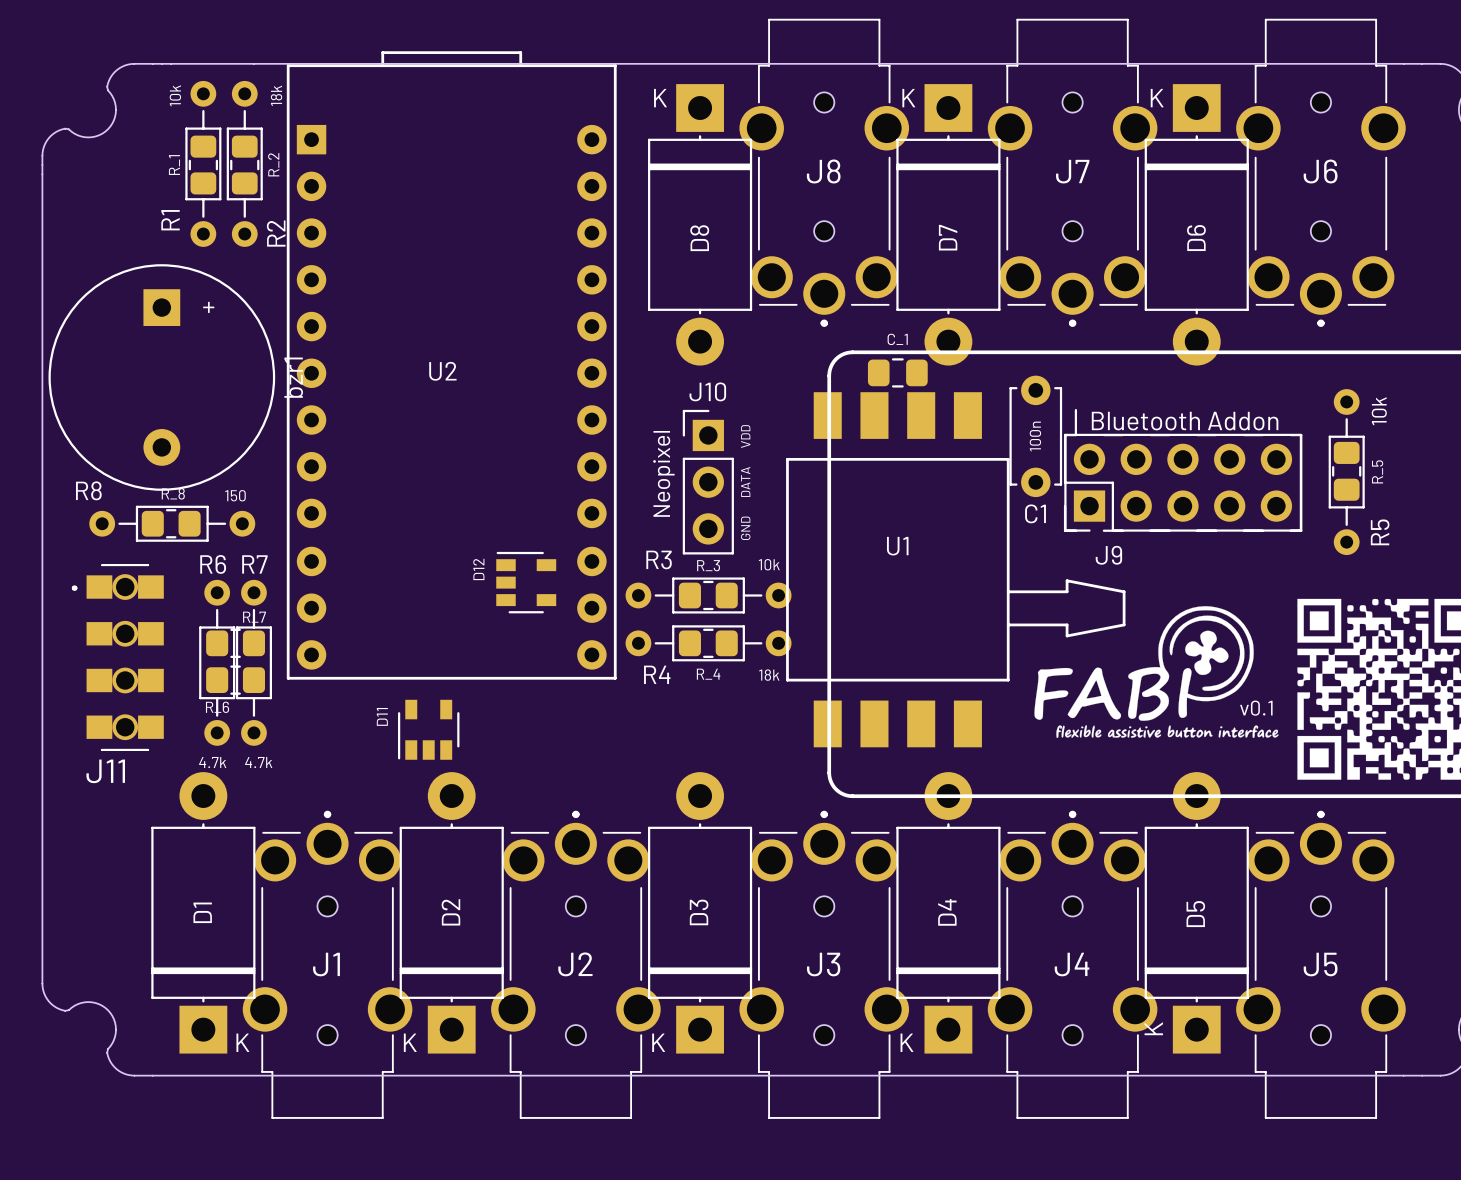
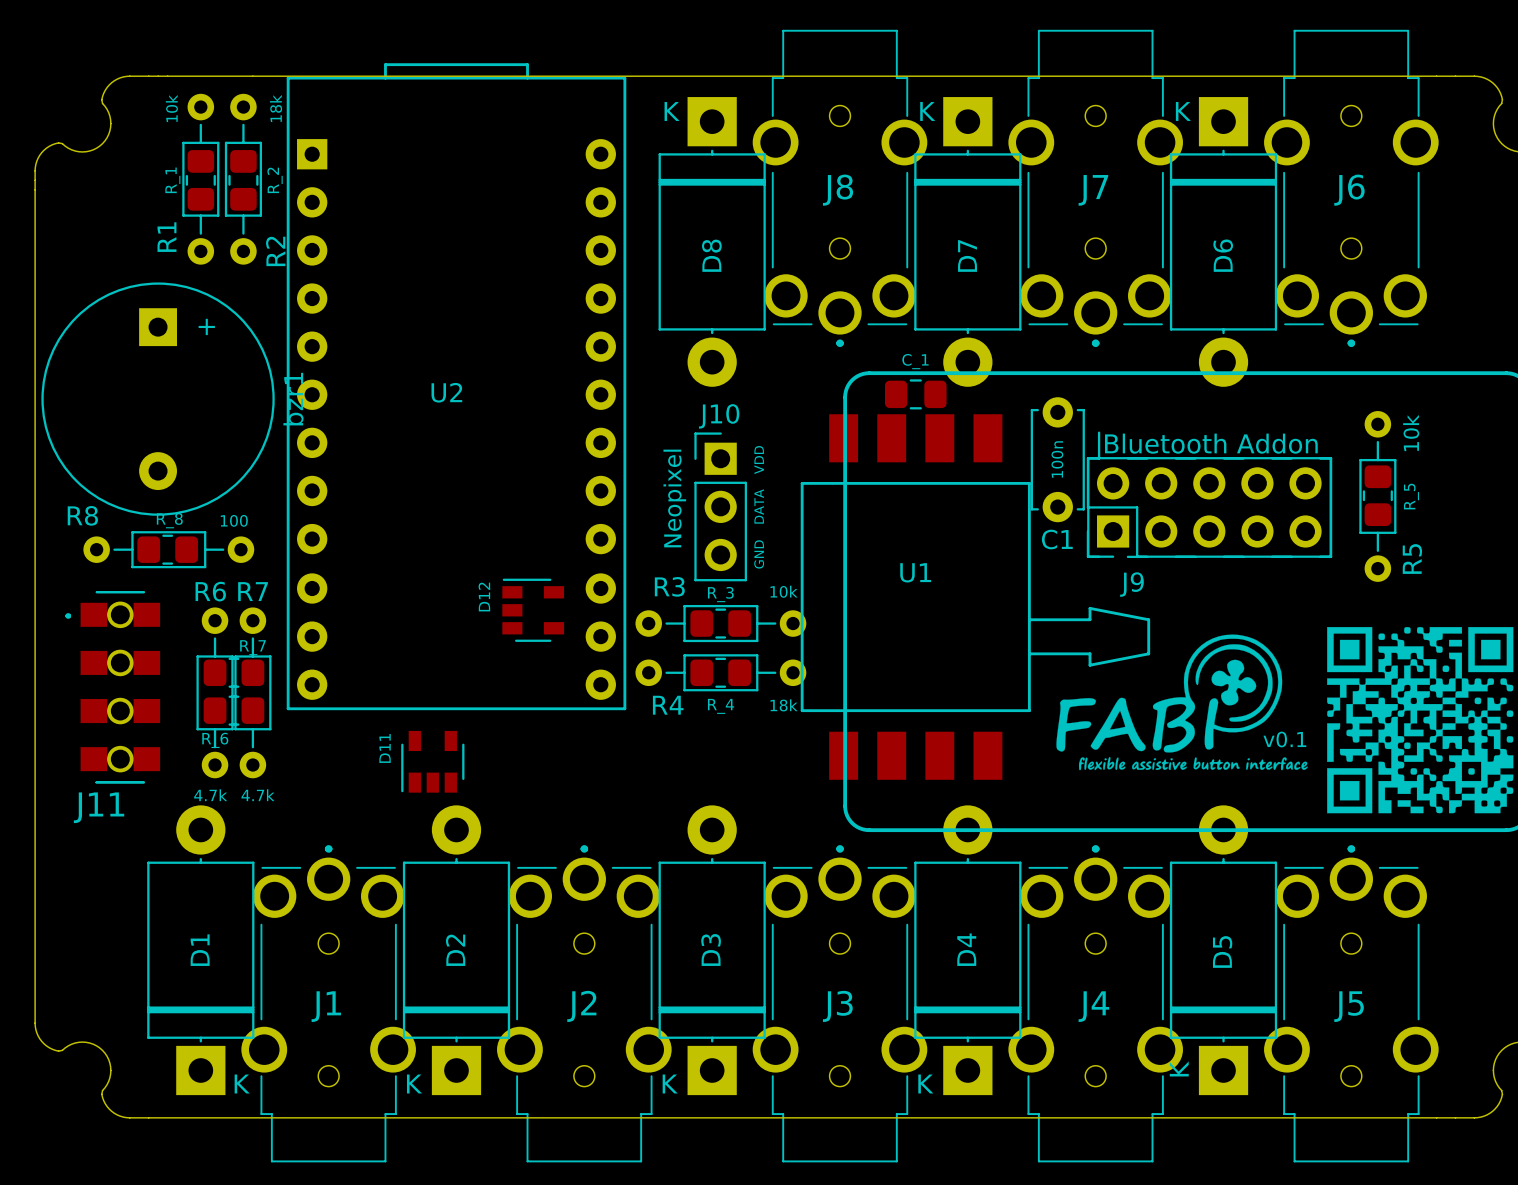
R8 value: 150 (235, 495) -> 100 (234, 520)

